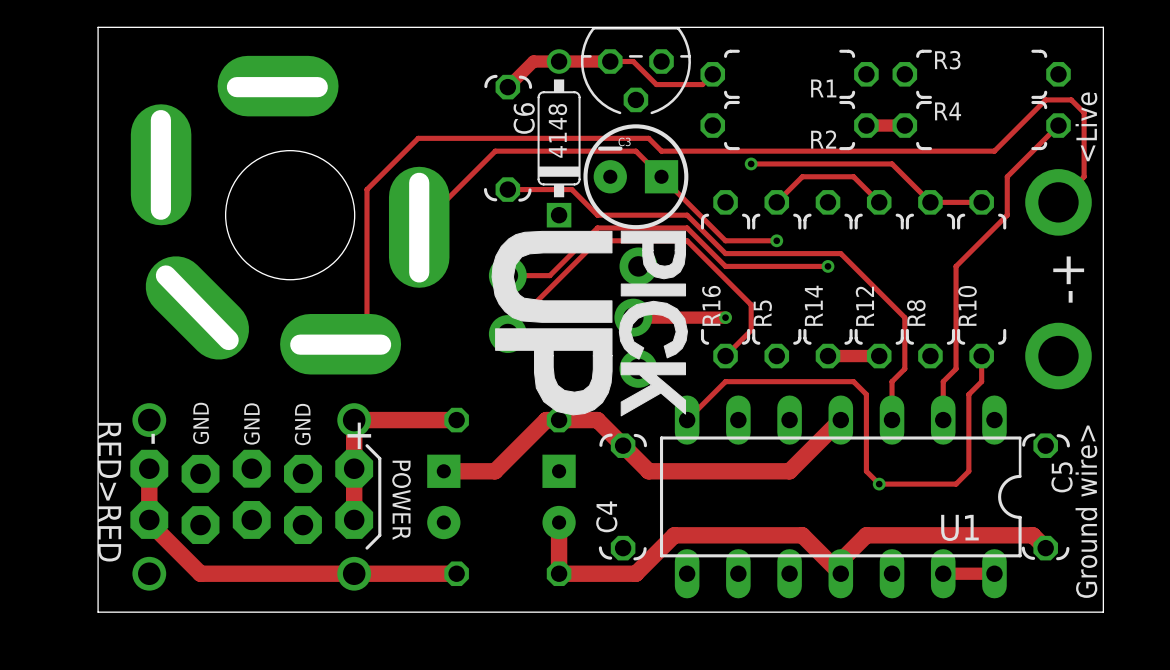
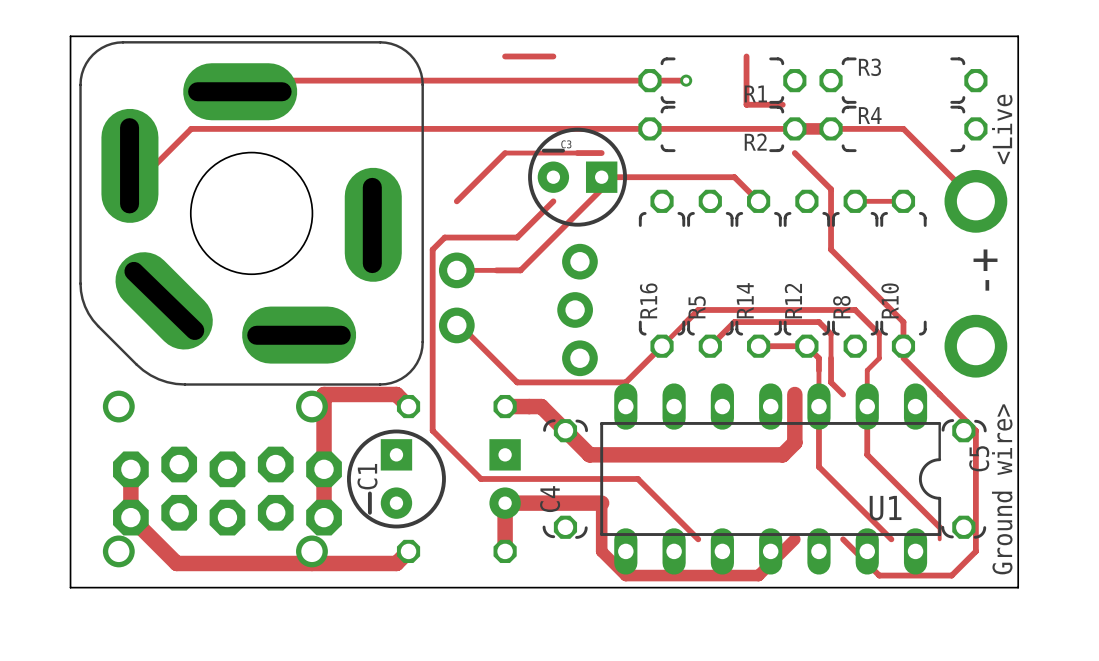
track: none -> (505, 56) (553, 56)
track: none -> (746, 56) (746, 104) (782, 104)
part: (635, 70) -> none
track: (712, 74) (702, 84) (656, 84) (633, 61) (533, 61) (507, 87) -> none
track: none -> (686, 80) (251, 80) (240, 91)
via: none -> (686, 80)
track: none -> (794, 128) (191, 128) (154, 165) (129, 165)
track: (1058, 125) (1007, 176) (1007, 215) (956, 266) (956, 343) -> (686, 322) (698, 309) (855, 309) (879, 334)
C6: (508, 138) -> none
4148: (559, 138) -> none
track: (559, 151) (495, 151) (419, 227) -> (505, 153) (456, 201)
track: (635, 151) (725, 240) (776, 240) -> (577, 153) (601, 153)
track: none -> (794, 153) (831, 189) (831, 249) (903, 322) (903, 346)
track: (751, 163) (892, 163) (930, 202) -> none
via: (751, 163) -> none
track: (507, 189) (571, 189) (597, 215) (687, 215) (725, 253) (840, 253) (904, 317) (904, 343) -> (710, 346) (734, 322) (818, 322) (831, 334)
track: none -> (553, 201) (517, 237) (444, 237) (432, 249) (432, 430) (480, 478) (637, 478) (698, 539)
track: (776, 202) (802, 176) (853, 176) (879, 202) -> none
track: (1058, 202) (1084, 176) (1084, 112) (1071, 99) (1045, 99) (994, 151) (661, 151) (648, 138) (418, 138) (366, 189) (366, 317) (340, 344) -> (975, 201) (903, 128) (831, 128)
part side: bottom (290, 215) -> top (251, 213)
drawing: [491, 230, 688, 417] -> none
via: (776, 240) -> none
track: (827, 266) (725, 266) (687, 227) (597, 227) (549, 275) -> (758, 201) (734, 177) (613, 177) (520, 270) (496, 270)
via: (827, 266) -> none
track: (638, 317) (725, 317) -> none
via: (725, 317) -> none
track: (751, 330) (751, 304) (687, 240) (597, 240) (507, 330) (507, 334) -> (662, 346) (625, 382) (517, 382) (460, 325) (456, 325)
track width: thick (827, 356) (879, 356) -> thin (758, 346) (806, 346)
track: (904, 368) (892, 381) -> (806, 346) (818, 358) (818, 370)
track: none -> (831, 358) (831, 382) (843, 394)
track: (981, 368) (981, 381) (968, 394) (968, 471) (956, 484) (879, 484) (866, 471) (866, 458) -> (903, 358) (975, 430) (975, 551) (951, 575) (879, 575) (843, 539)
track: (866, 407) (866, 394) (853, 381) (725, 381) (687, 420) -> none
track width: thin (866, 407) (866, 458) -> thick (794, 394) (794, 442)
track: (456, 420) (354, 420) (354, 519) -> (408, 406) (396, 394) (324, 394) (324, 517)
track: (559, 420) (546, 420) (495, 471) (443, 471) -> none
track: (840, 420) (789, 471) -> (794, 442) (782, 454) (722, 454)
track: none -> (818, 406) (818, 466) (891, 539)
track: none -> (867, 406) (867, 454) (939, 527) (939, 539)
track: (149, 468) (149, 522) (200, 573) (456, 573) -> (130, 469) (130, 517) (176, 563) (396, 563) (408, 551)
via: (879, 484) -> none
part side: top (255, 496) -> bottom (227, 491)
C1 side: bottom (443, 496) -> top (396, 478)
track: none -> (505, 503) (601, 503) (601, 551) (625, 575) (758, 575) (794, 539)
track: (1045, 548) (1032, 535) (866, 535) (840, 560) (840, 573) (802, 535) (674, 535) (635, 573) (559, 573) -> none
track: (943, 573) (994, 573) -> none

